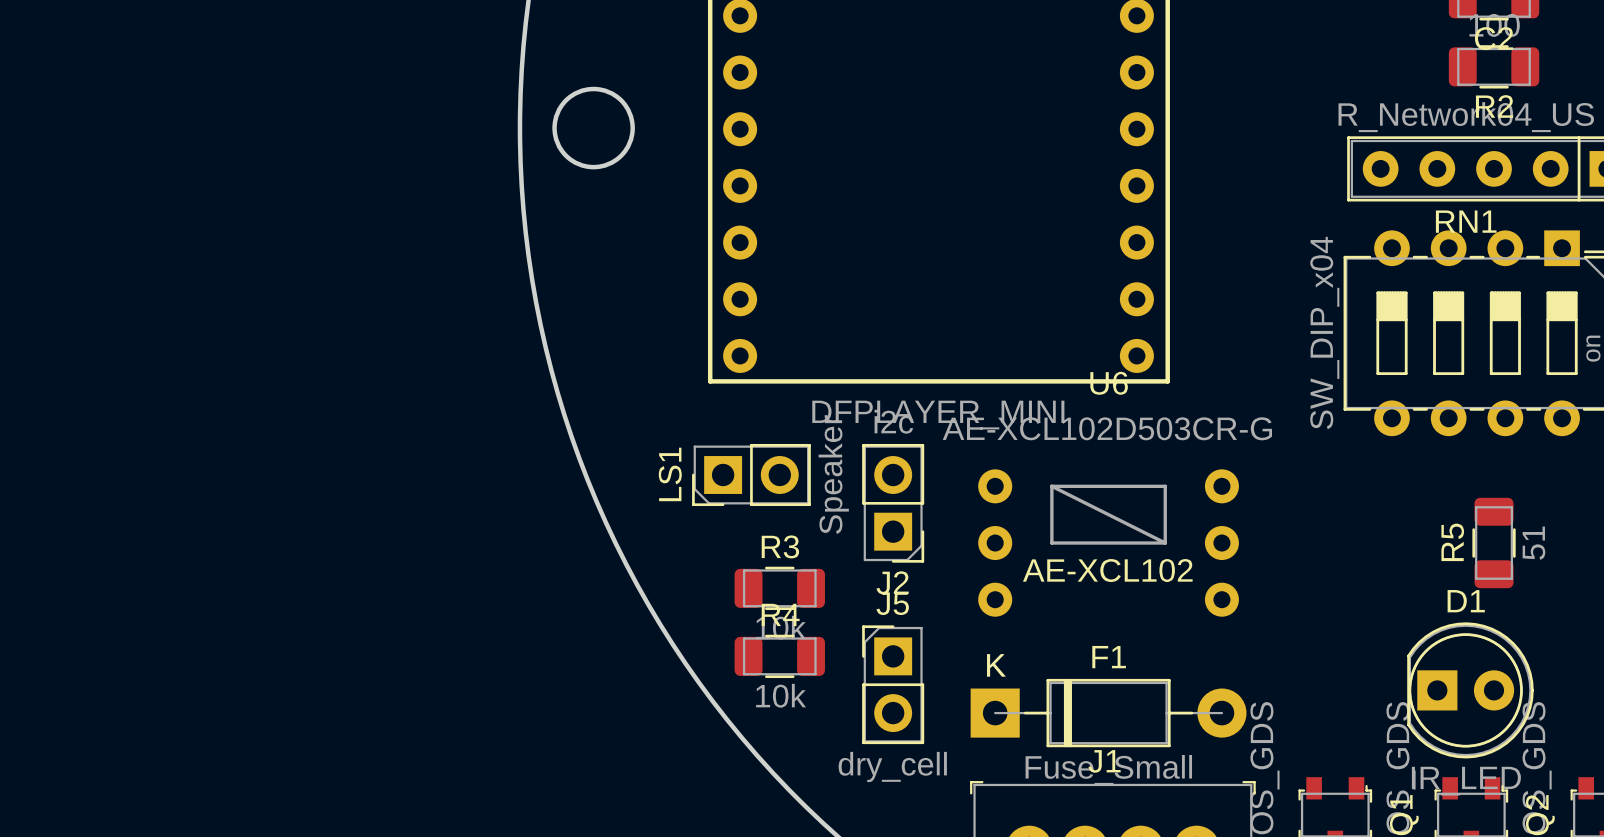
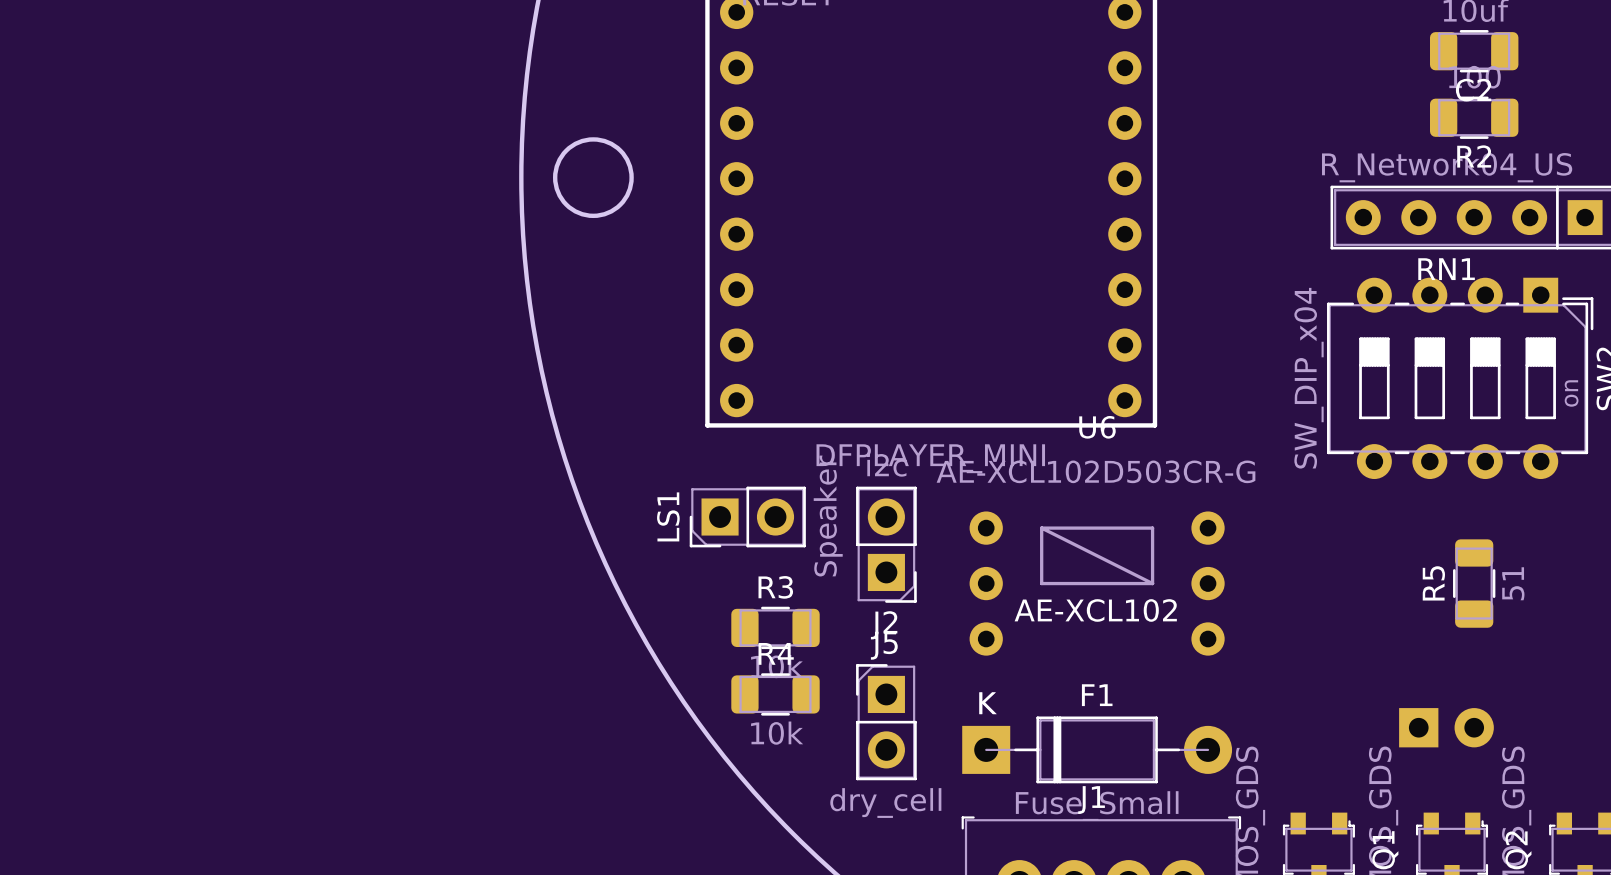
D1 side: top (1470, 690) -> bottom (1446, 727)

